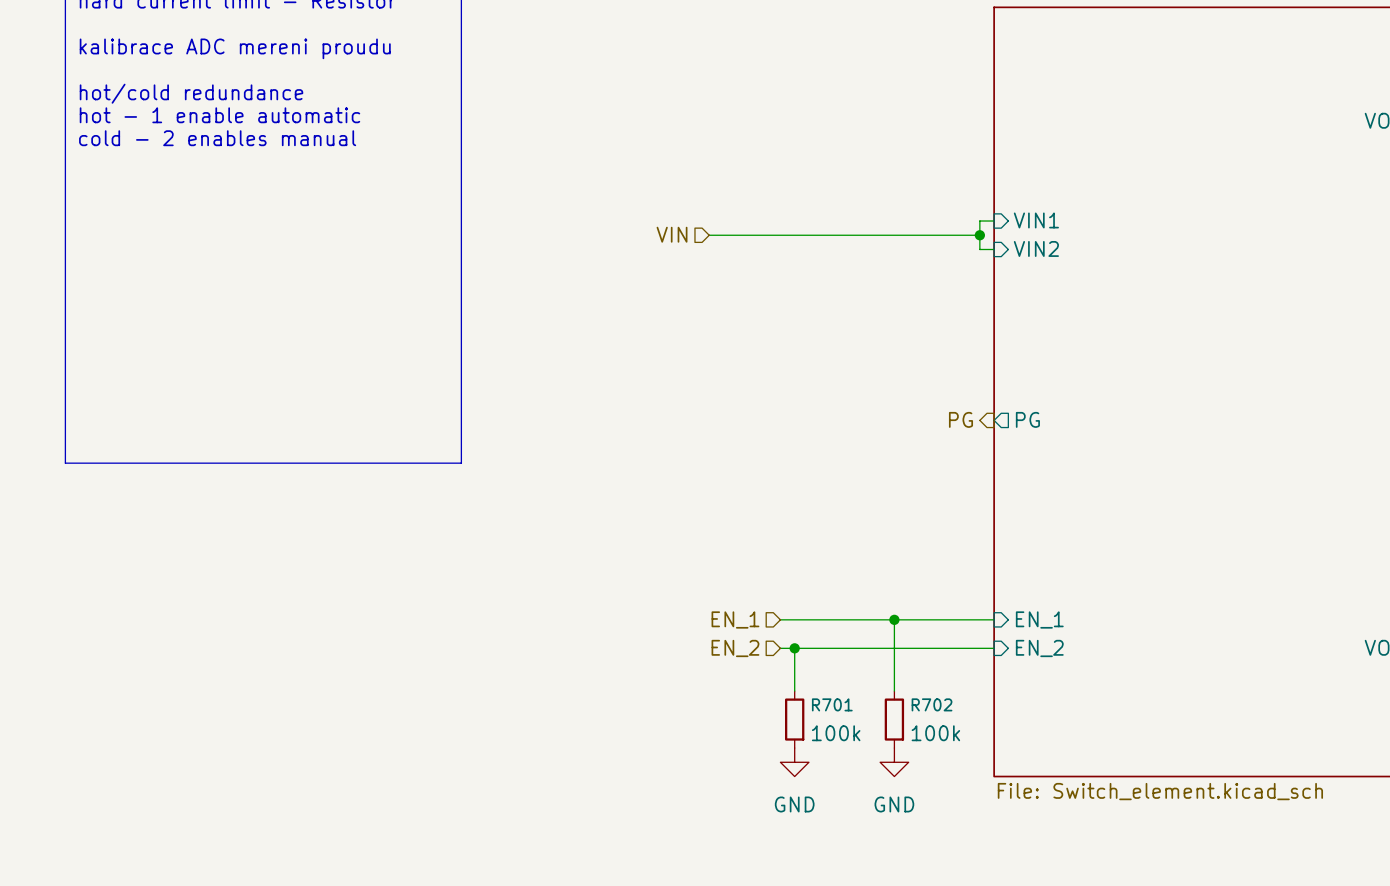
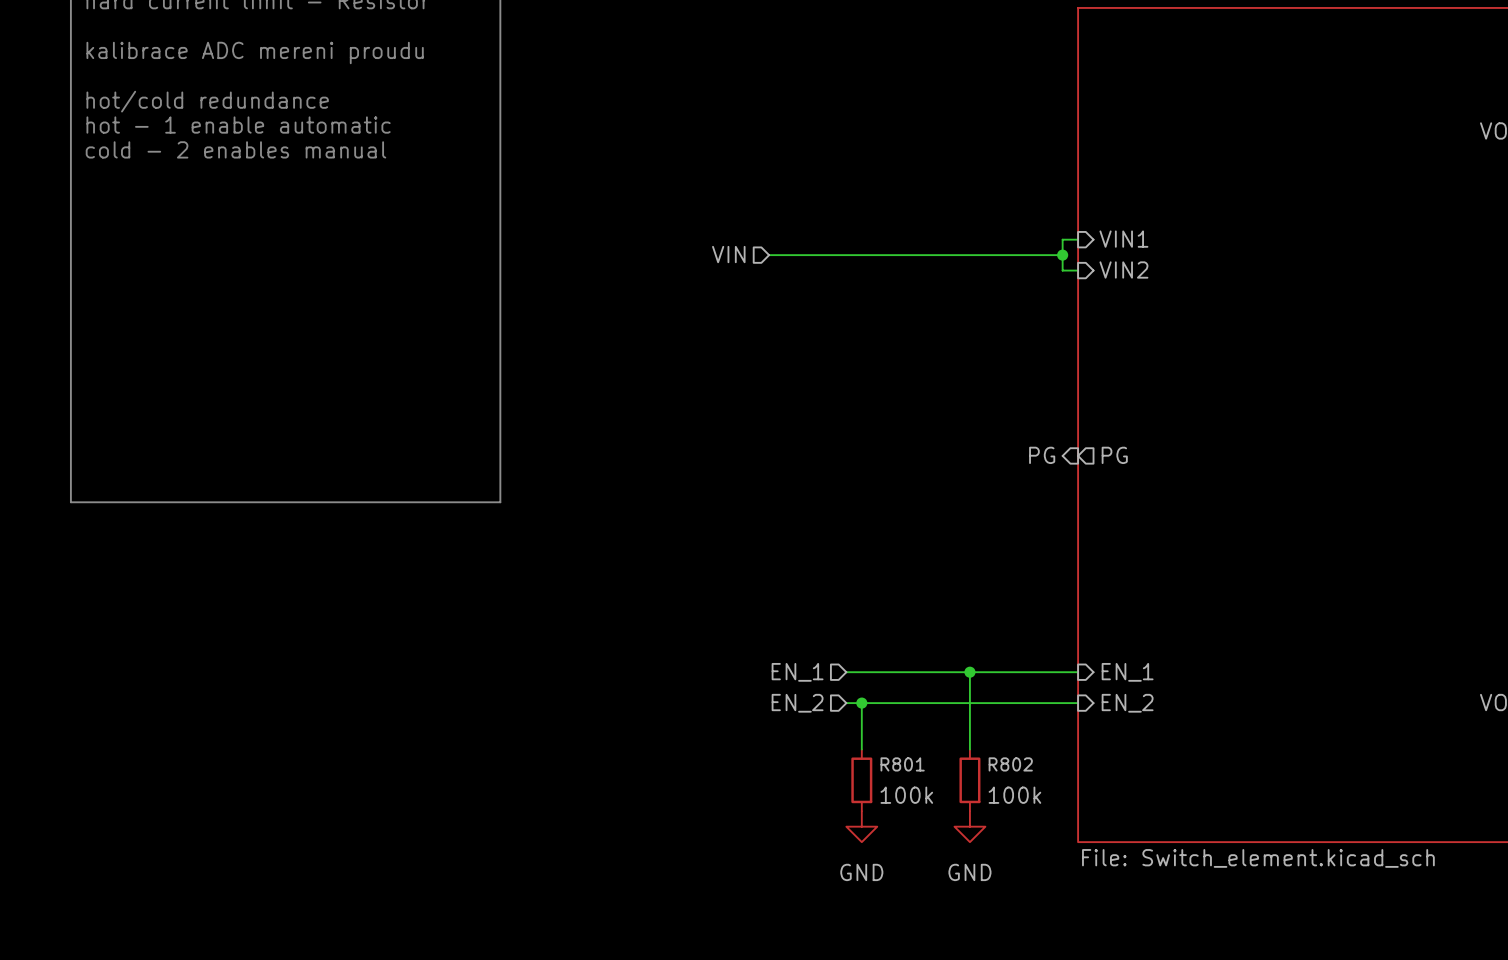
R701 name: R701 (832, 704) -> R801 (902, 764)
R702 name: R702 (932, 704) -> R802 (1010, 764)

